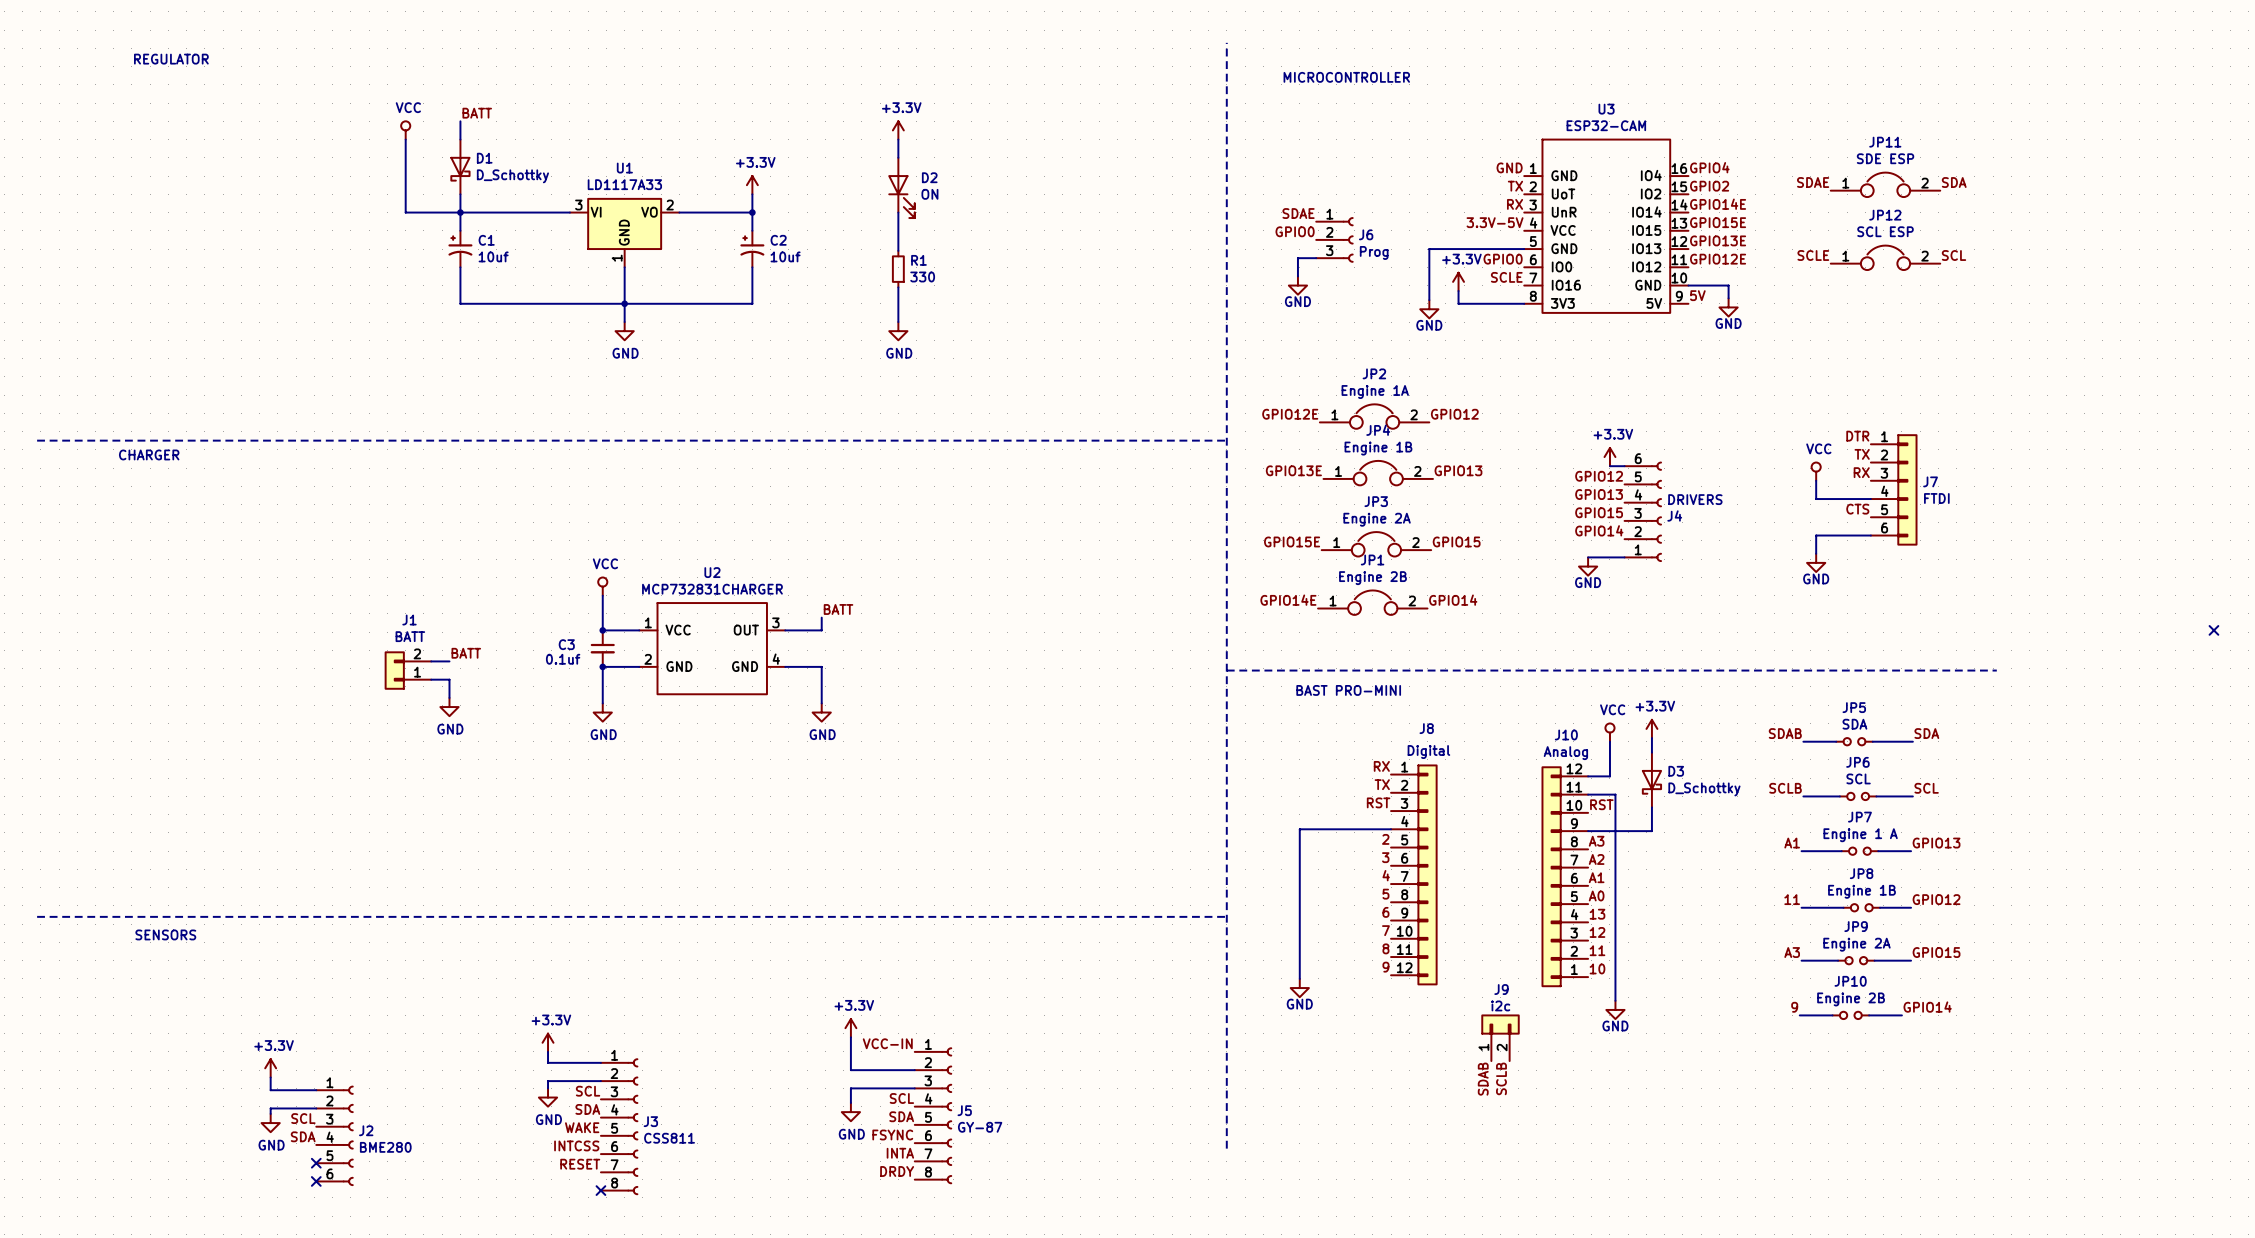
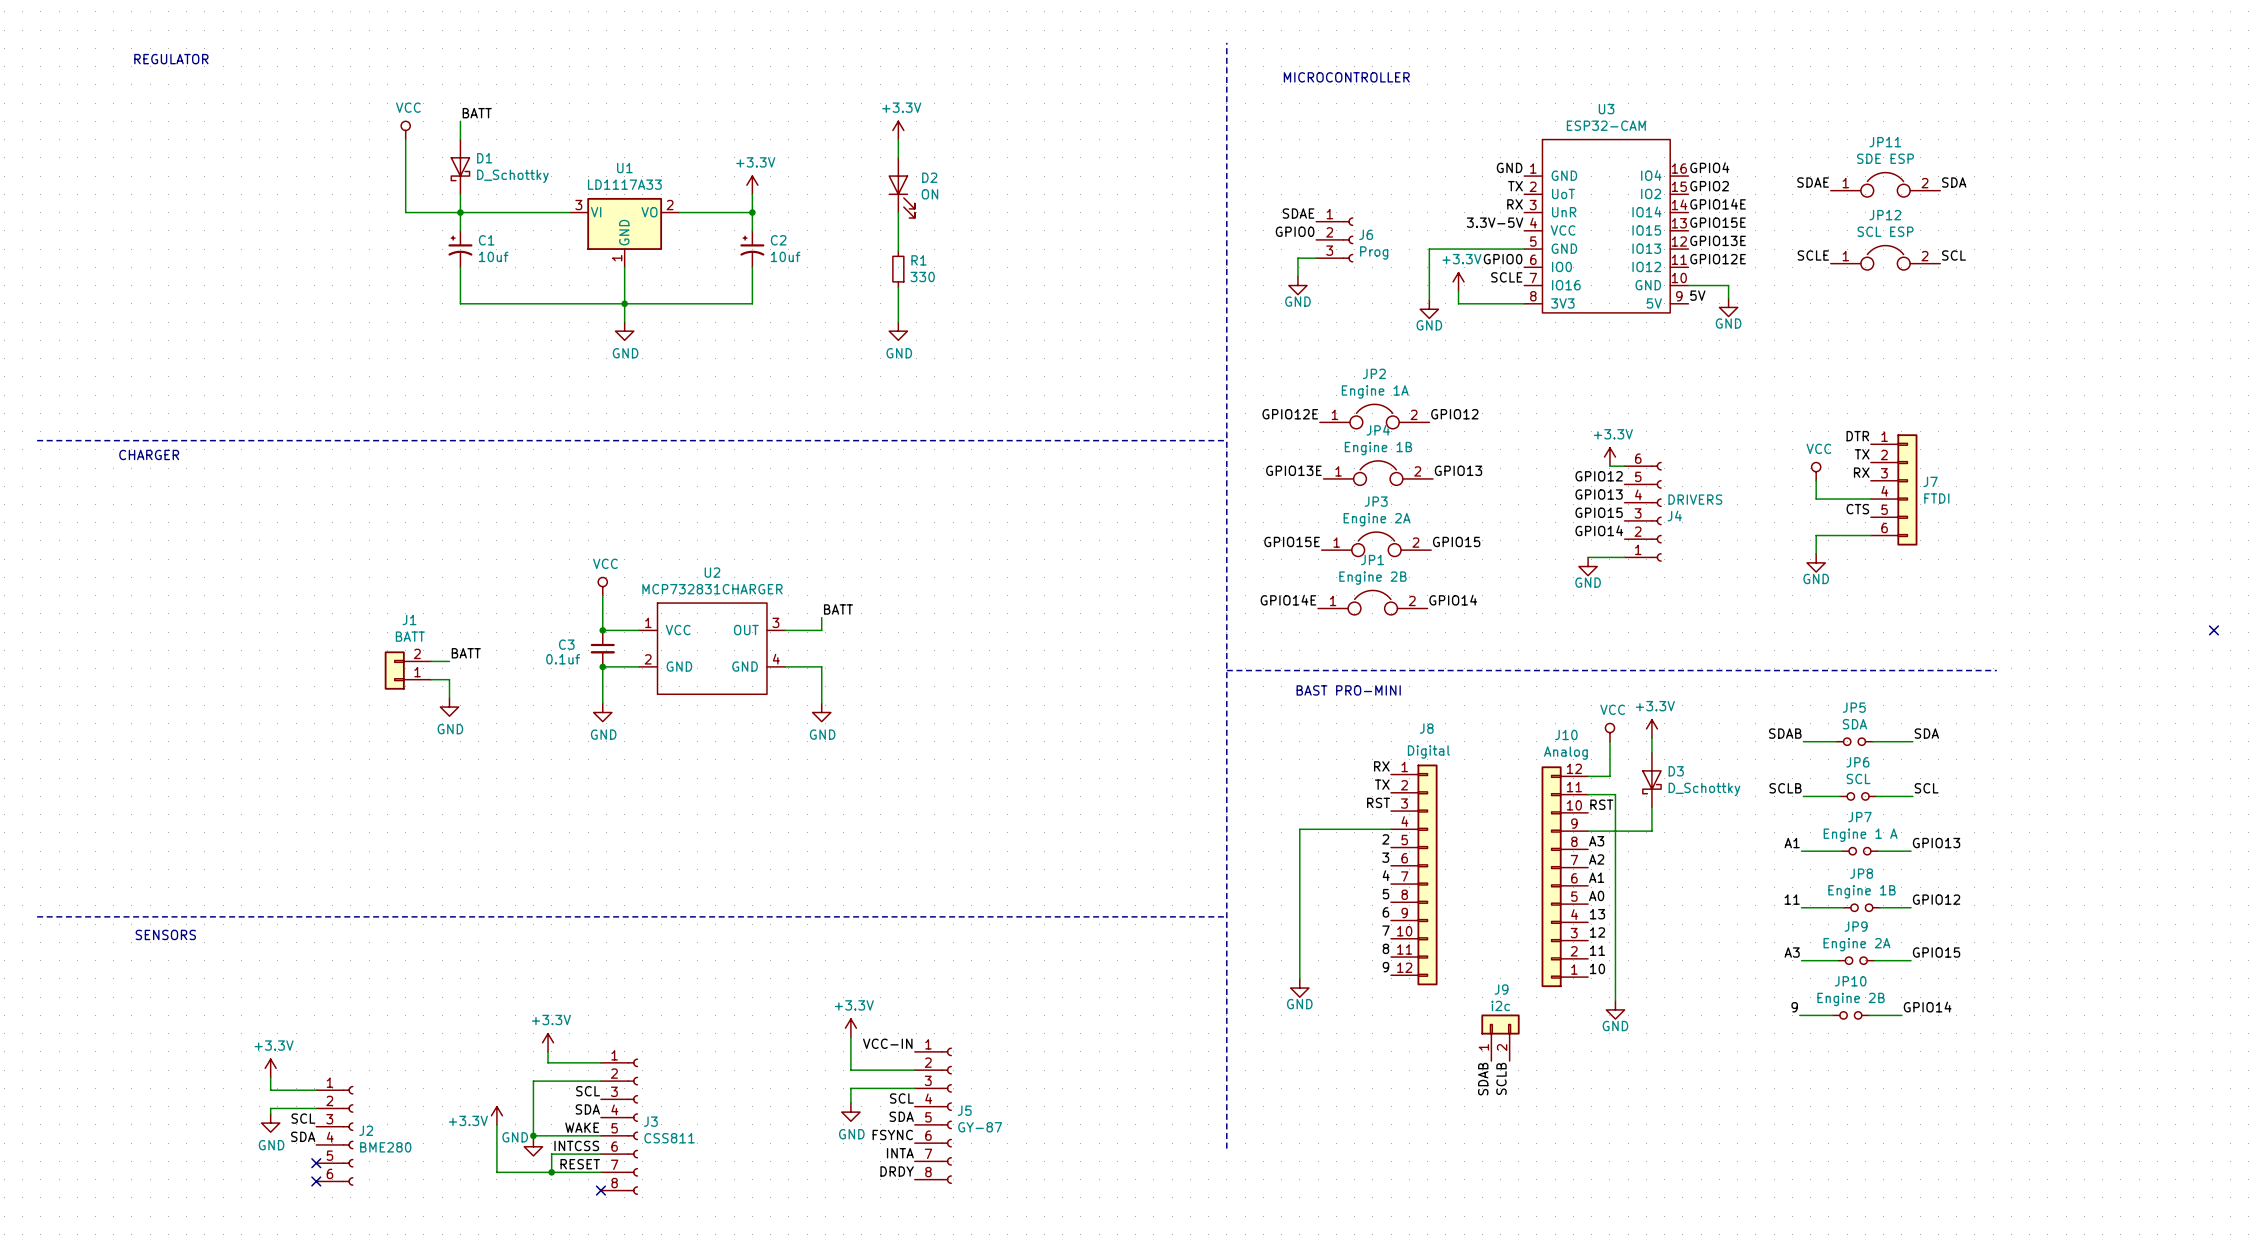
wire: (548, 1081) (548, 1088) -> (548, 1081) (533, 1081) (533, 1137)
power symbol position: GND (548, 1097) -> GND (533, 1146)
power symbol: none -> +3.3V (496, 1115)
power symbol text position: GND (548, 1119) -> GND (515, 1137)
wire: none -> (496, 1124) (496, 1172) (600, 1172)
wire: none -> (533, 1135) (600, 1135)
junction: none -> (533, 1135)
wire: none -> (600, 1154) (551, 1154) (551, 1172)
junction: none -> (551, 1172)

